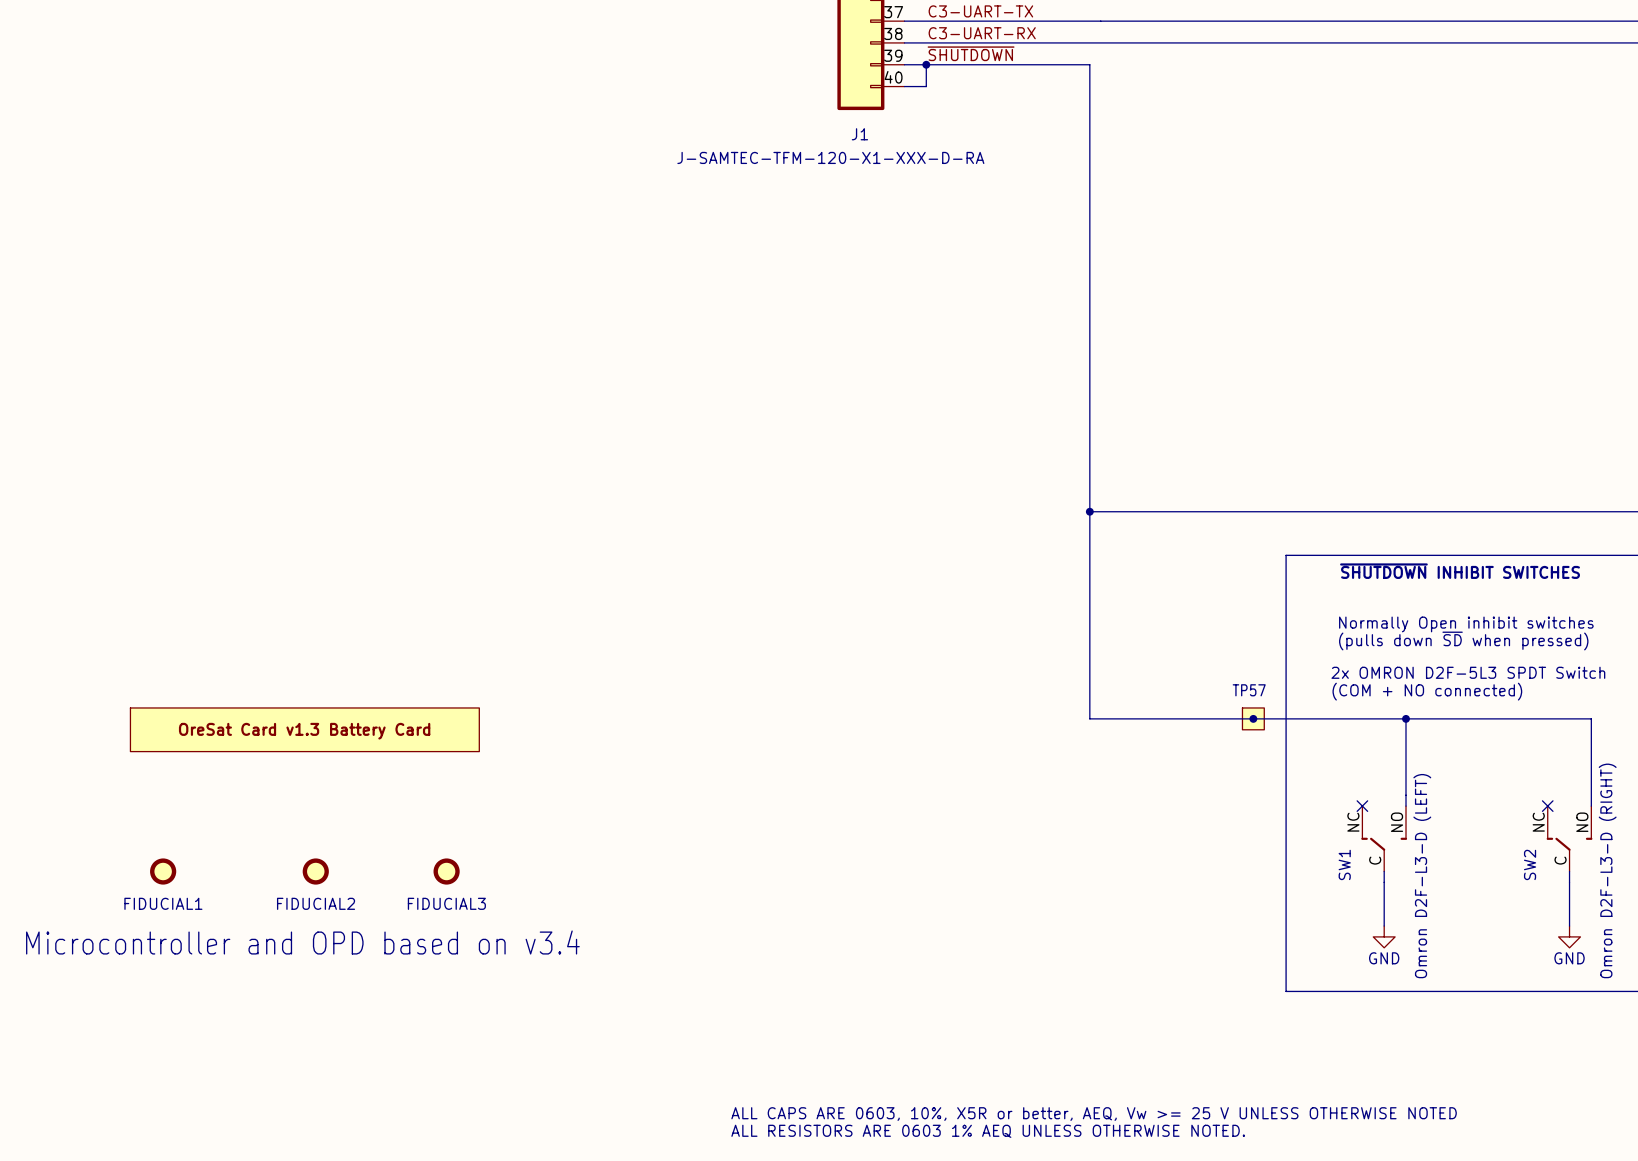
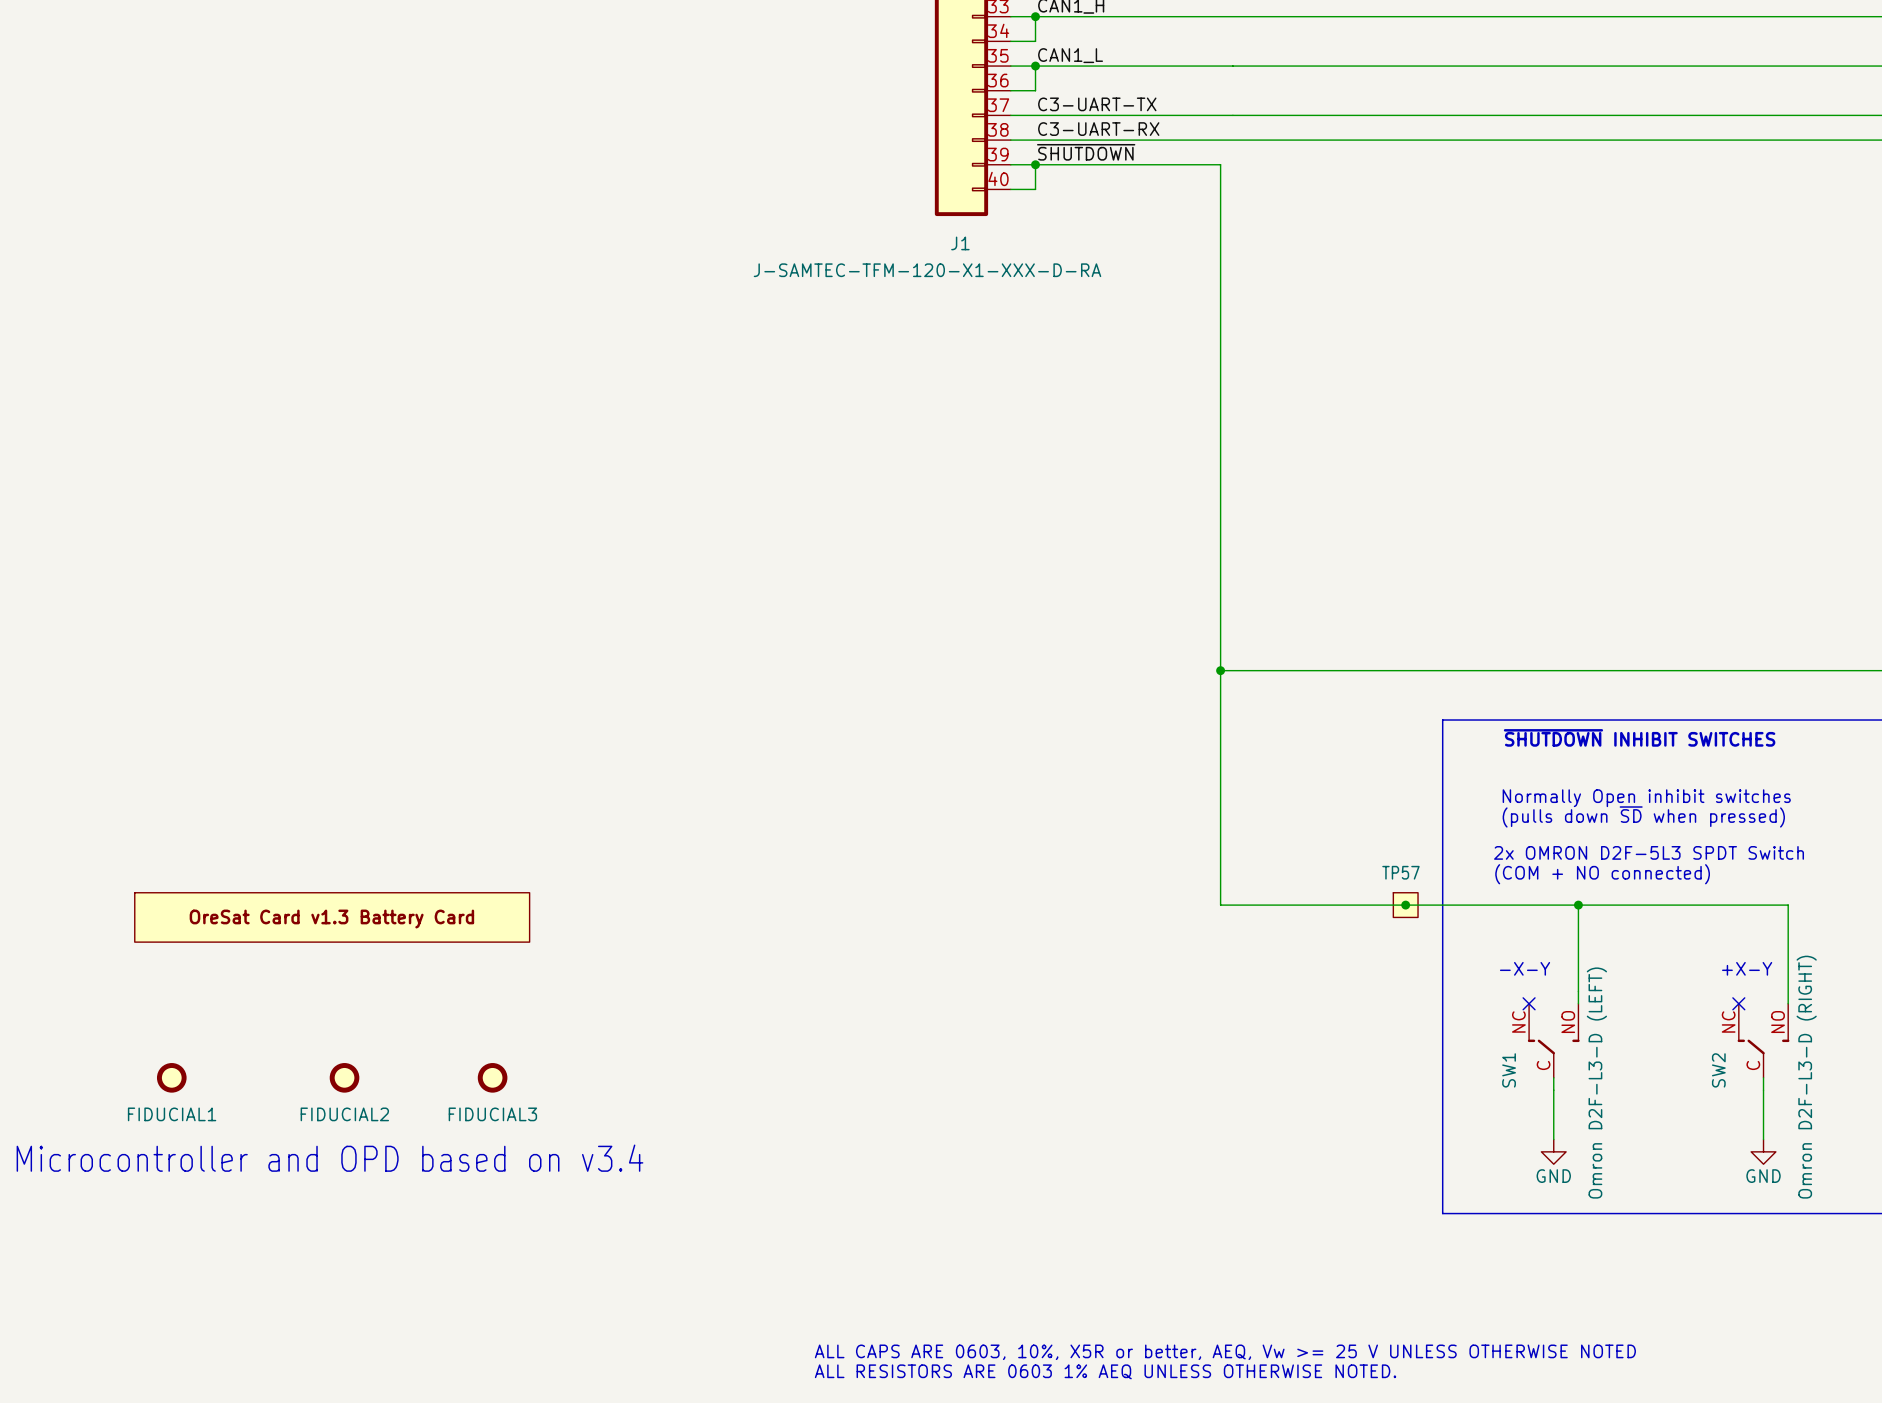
text: none -> -X-Y (1525, 968)
text: none -> +X-Y (1747, 968)

